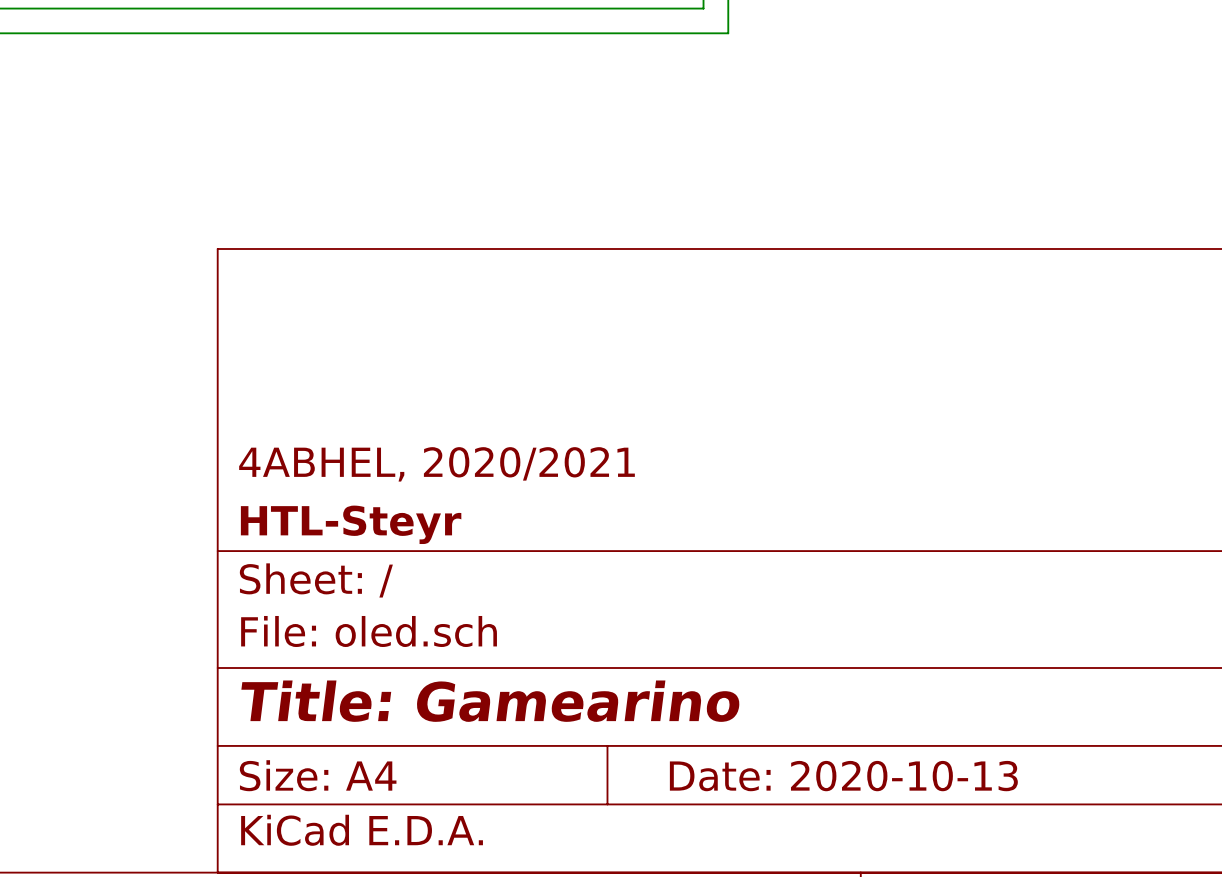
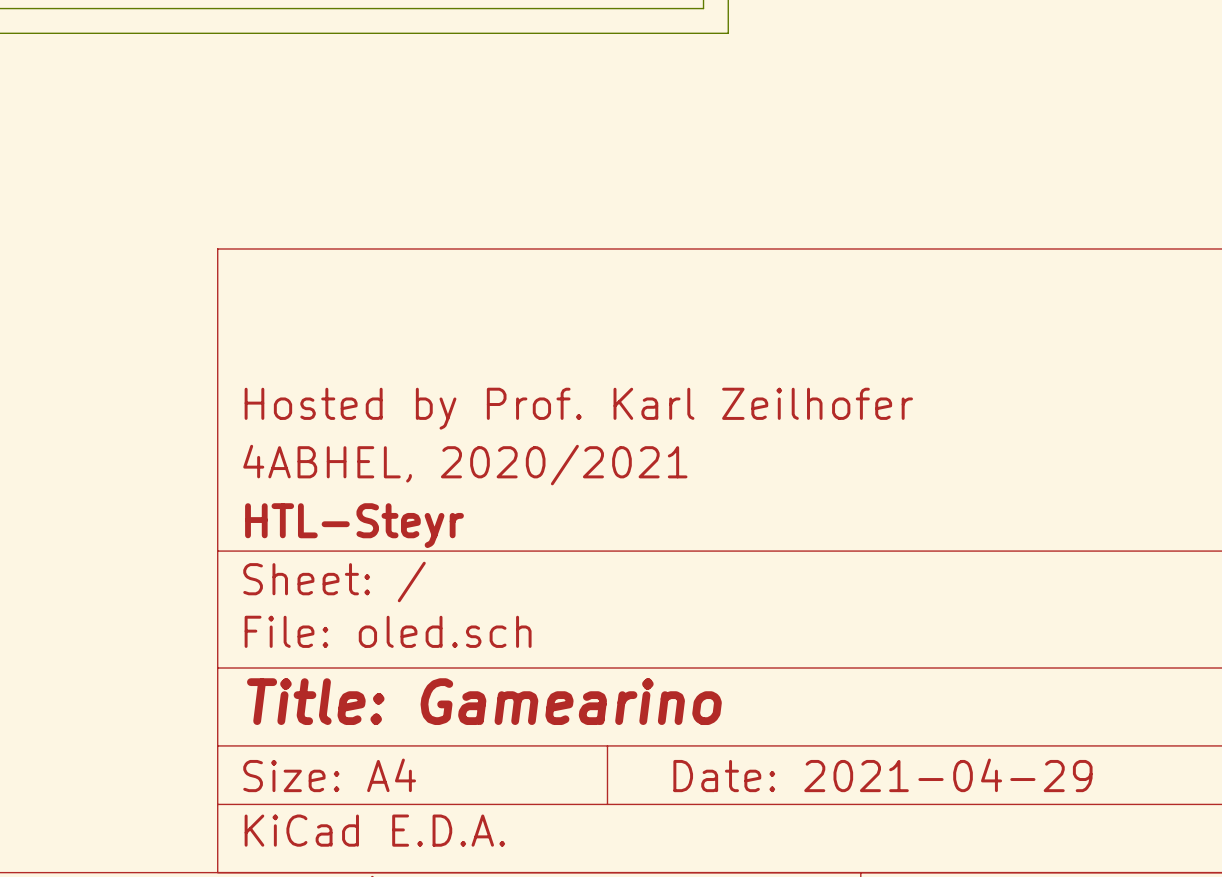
title block: none -> Hosted by Prof. Karl Zeilhofer (578, 408)
title block: Date: 2020-10-13 (843, 776) -> Date: 2021-04-29 (882, 775)

